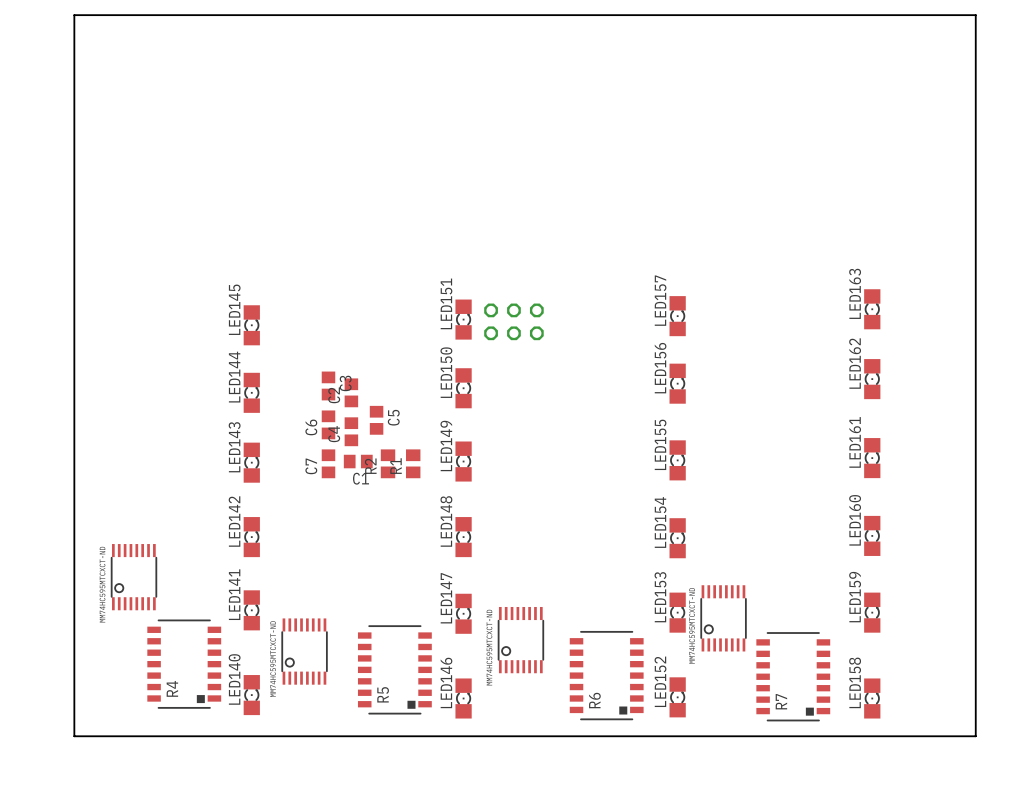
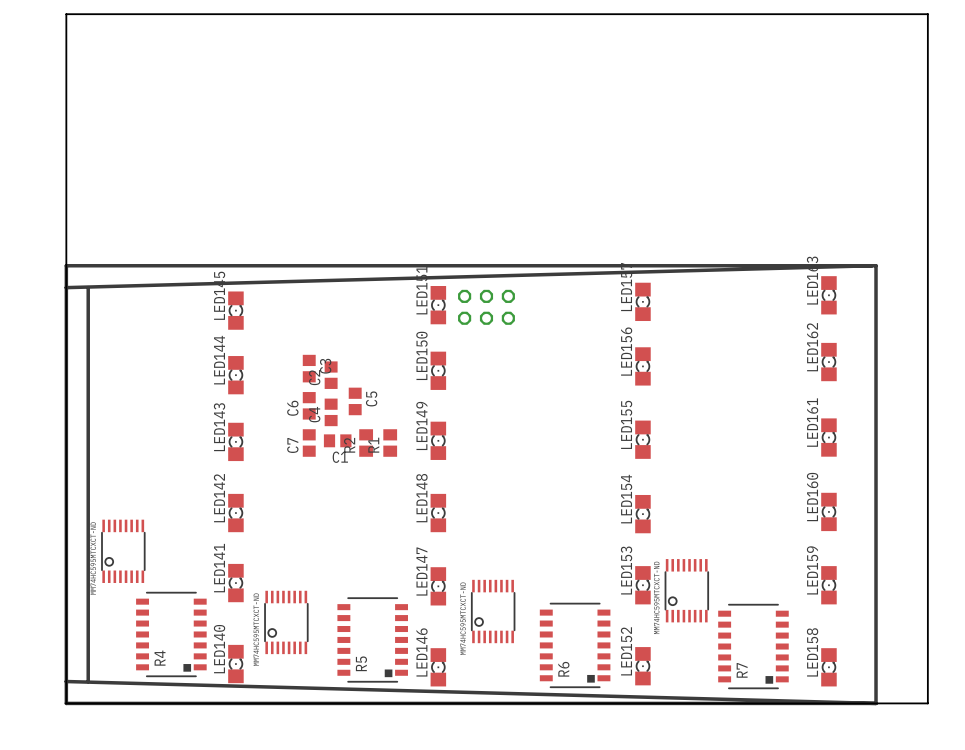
line: none -> (871, 265) (66, 287)
line: none -> (88, 287) (88, 681)
line: none -> (66, 681) (876, 703)
line: none -> (876, 703) (876, 265) (66, 265) (66, 703) (876, 703)

